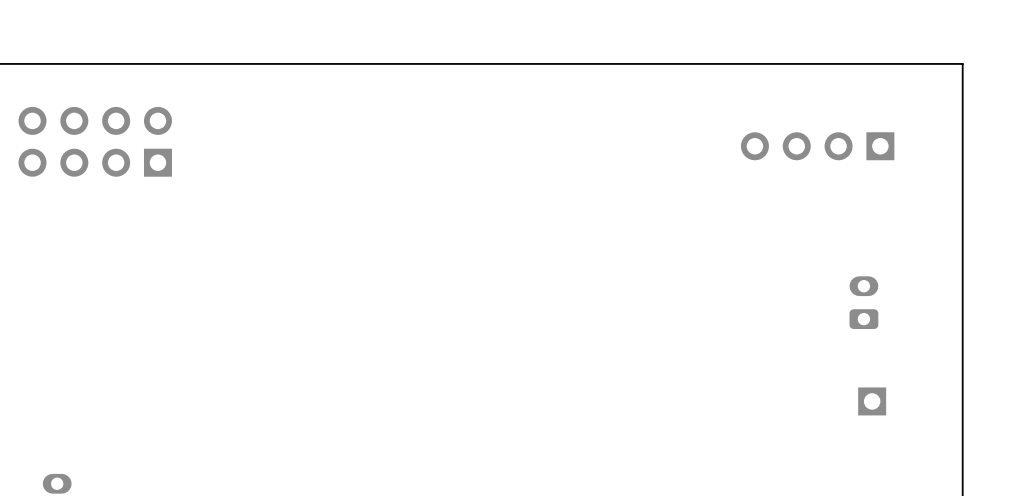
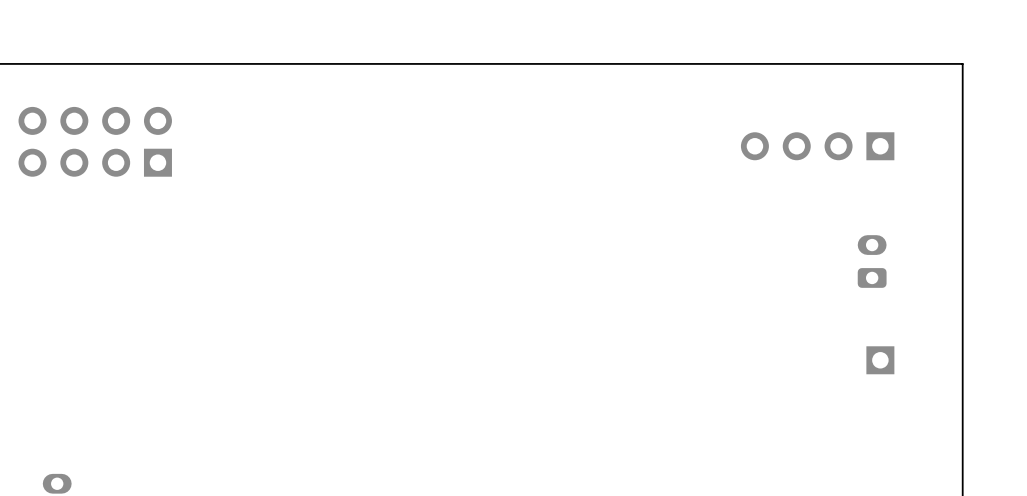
part position: (863, 302) -> (872, 261)
part position: (872, 401) -> (880, 360)

